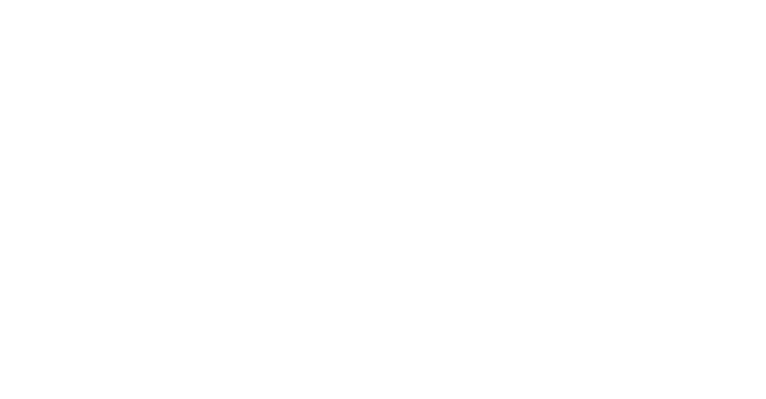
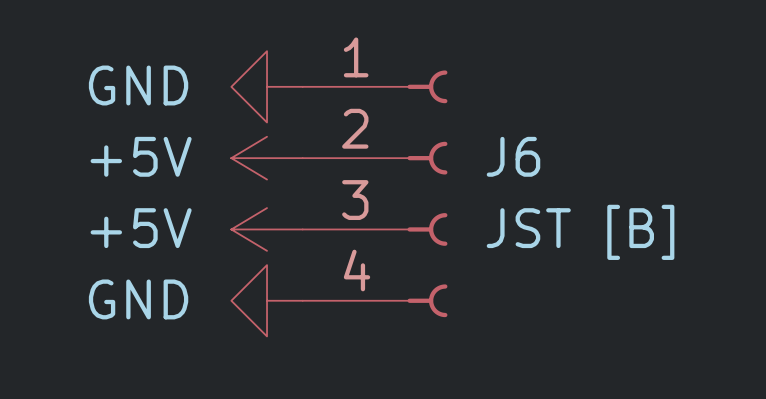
power symbol: none -> GND (267, 86)
power symbol: none -> +5V (267, 158)
J6: none -> JST [B] (375, 193)
power symbol: none -> +5V (267, 229)
power symbol: none -> GND (267, 300)

